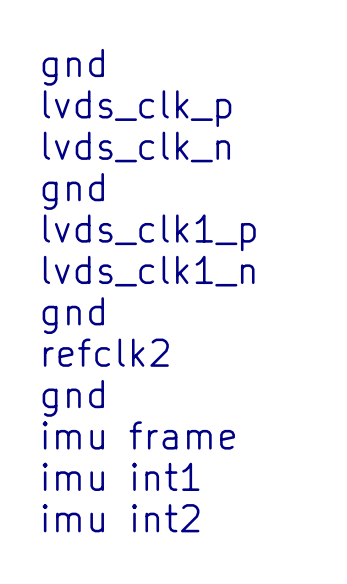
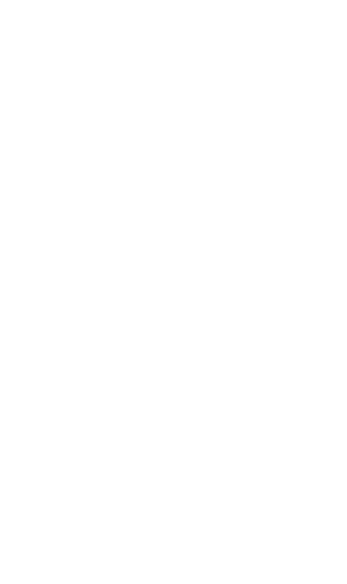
text: gnd (73, 67) -> none
text: lvds_clk_p (137, 108) -> none
text: lvds_clk_n (136, 146) -> none
text: gnd (73, 191) -> none
text: lvds_clk1_p (149, 232) -> none
text: lvds_clk1_n (149, 271) -> none
text: gnd (73, 315) -> none
text: refclk2 (106, 352) -> none
text: gnd (73, 398) -> none
text: imu frame (138, 435) -> none
text: imu int1 (121, 476) -> none
text: imu int2 (121, 518) -> none

